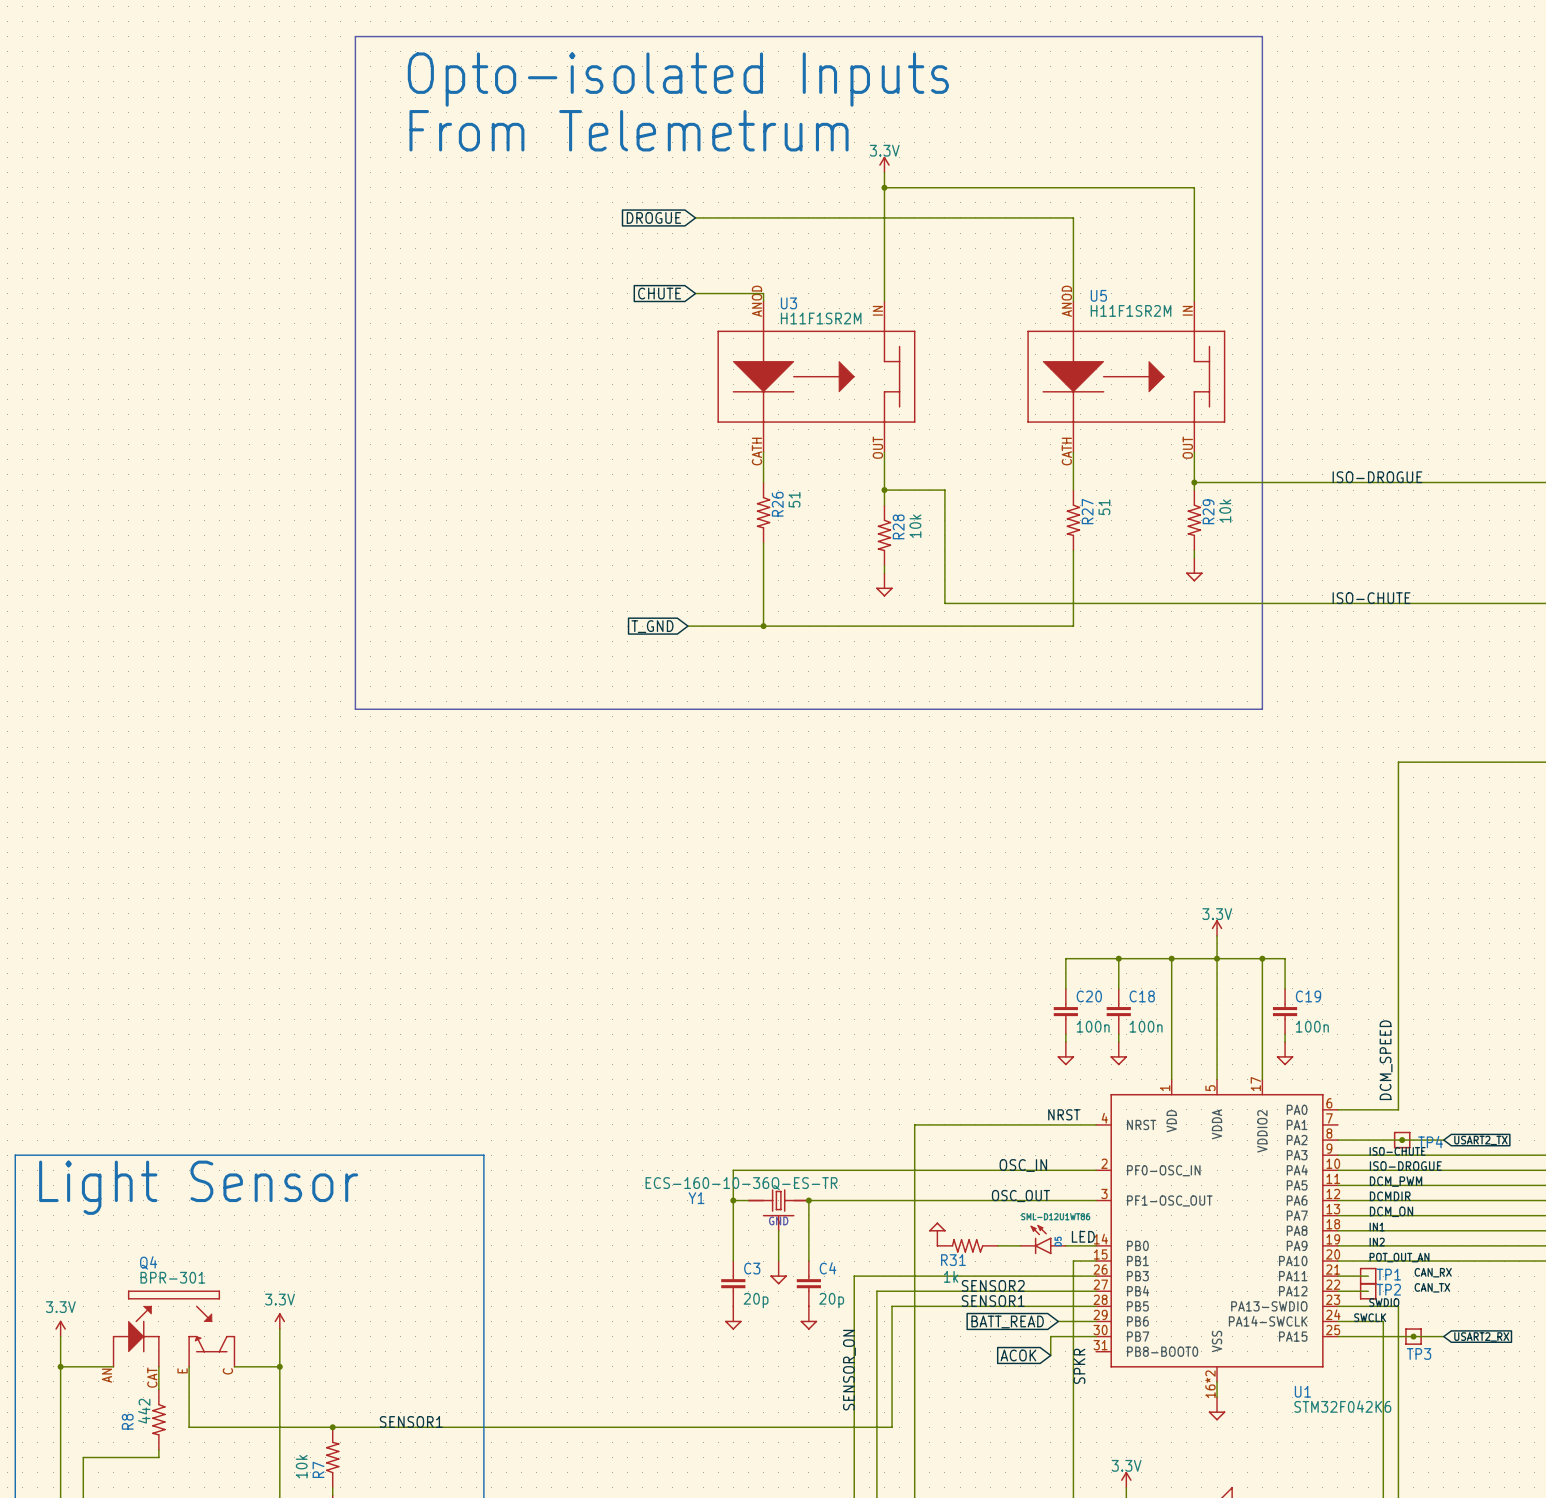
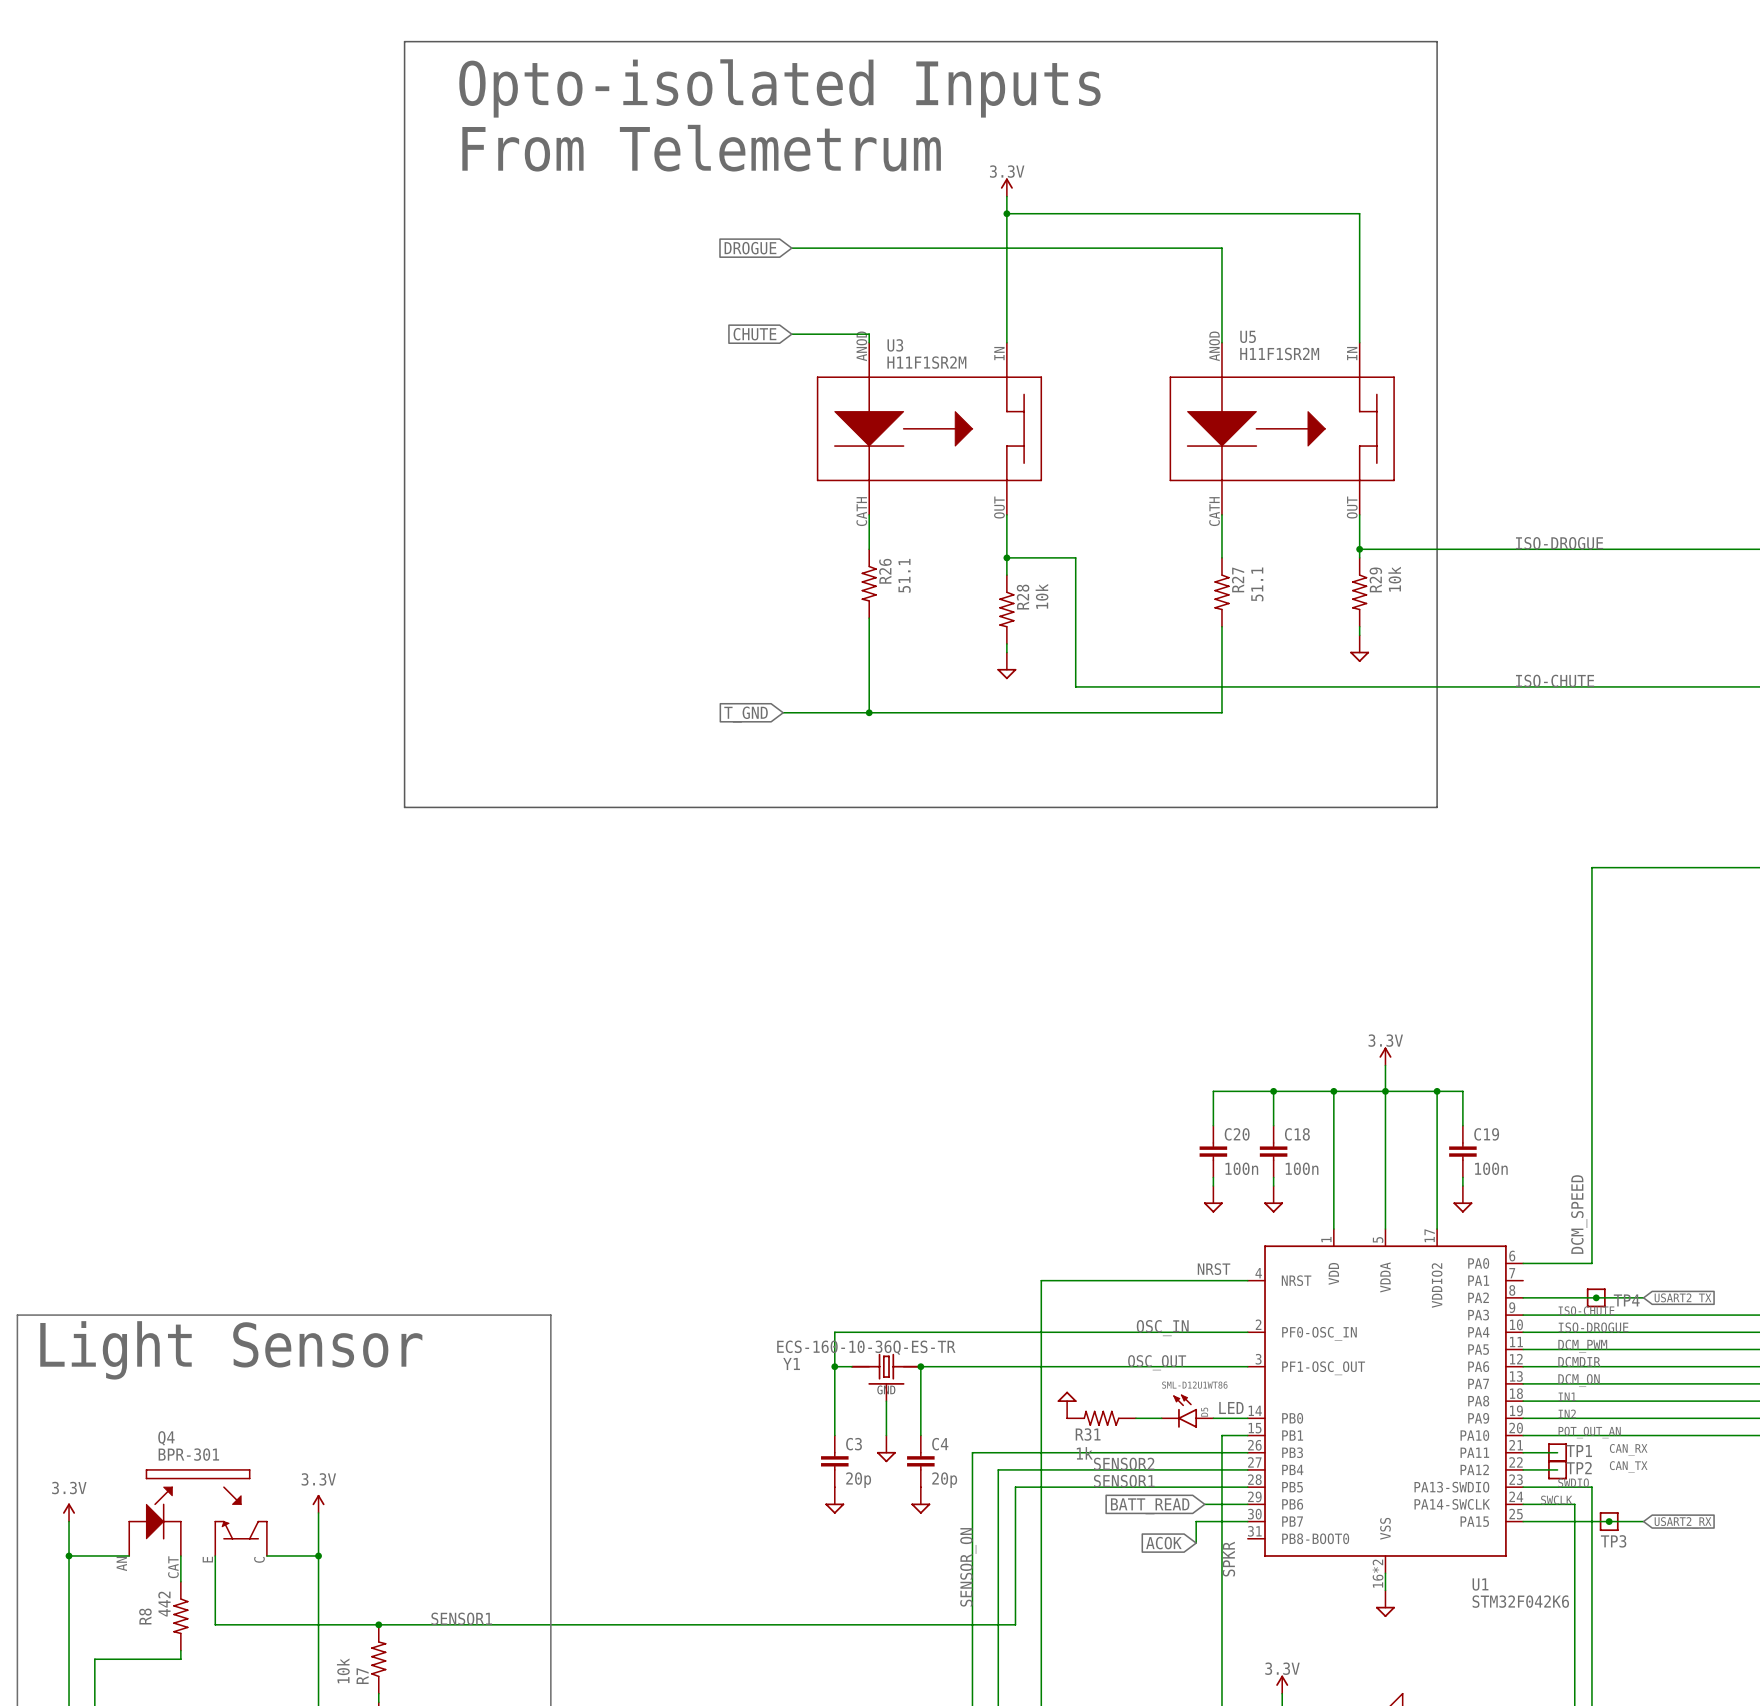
R26 value: 51 (794, 499) -> 51.1 (904, 575)
R27 value: 51 (1104, 507) -> 51.1 (1257, 584)

